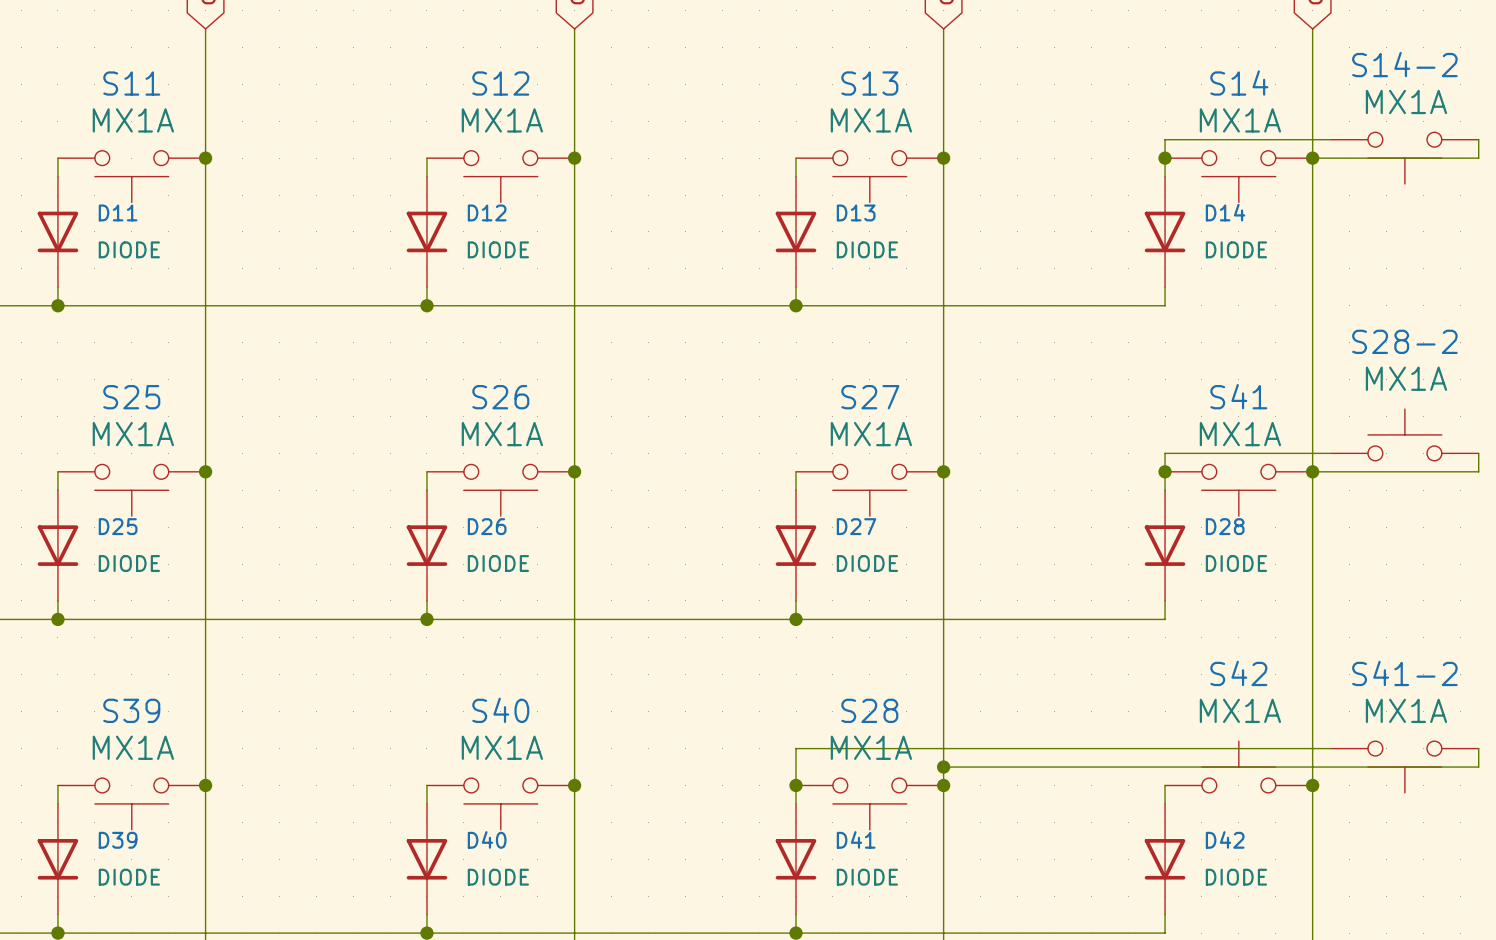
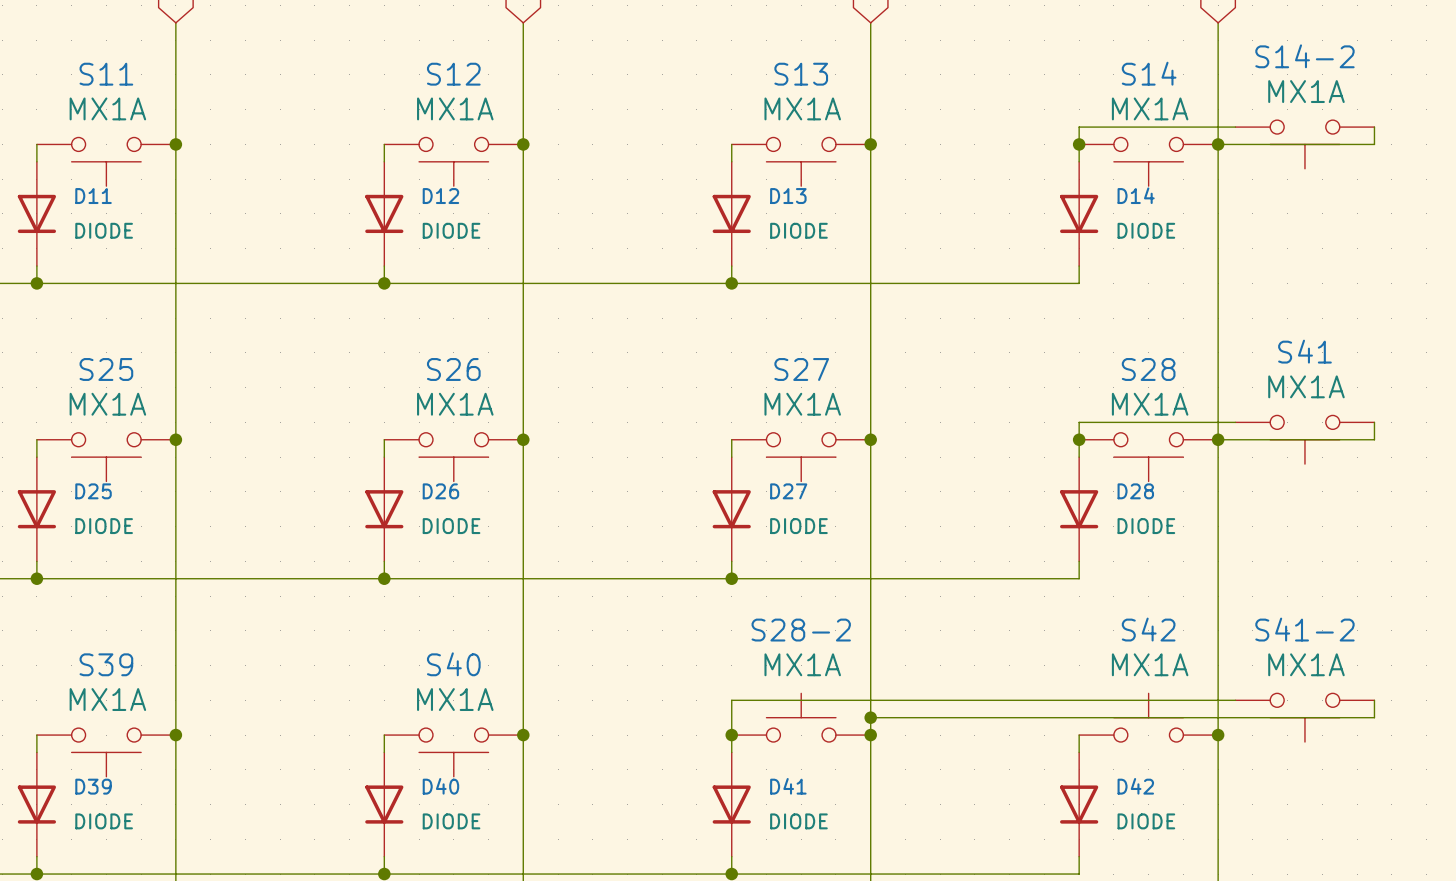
S41 name: S41 (1238, 396) -> S28 (1148, 369)
S28-2 position: (1404, 434) -> (801, 717)
S41: none -> MX1A (1304, 439)
S28: MX1A (869, 803) -> none

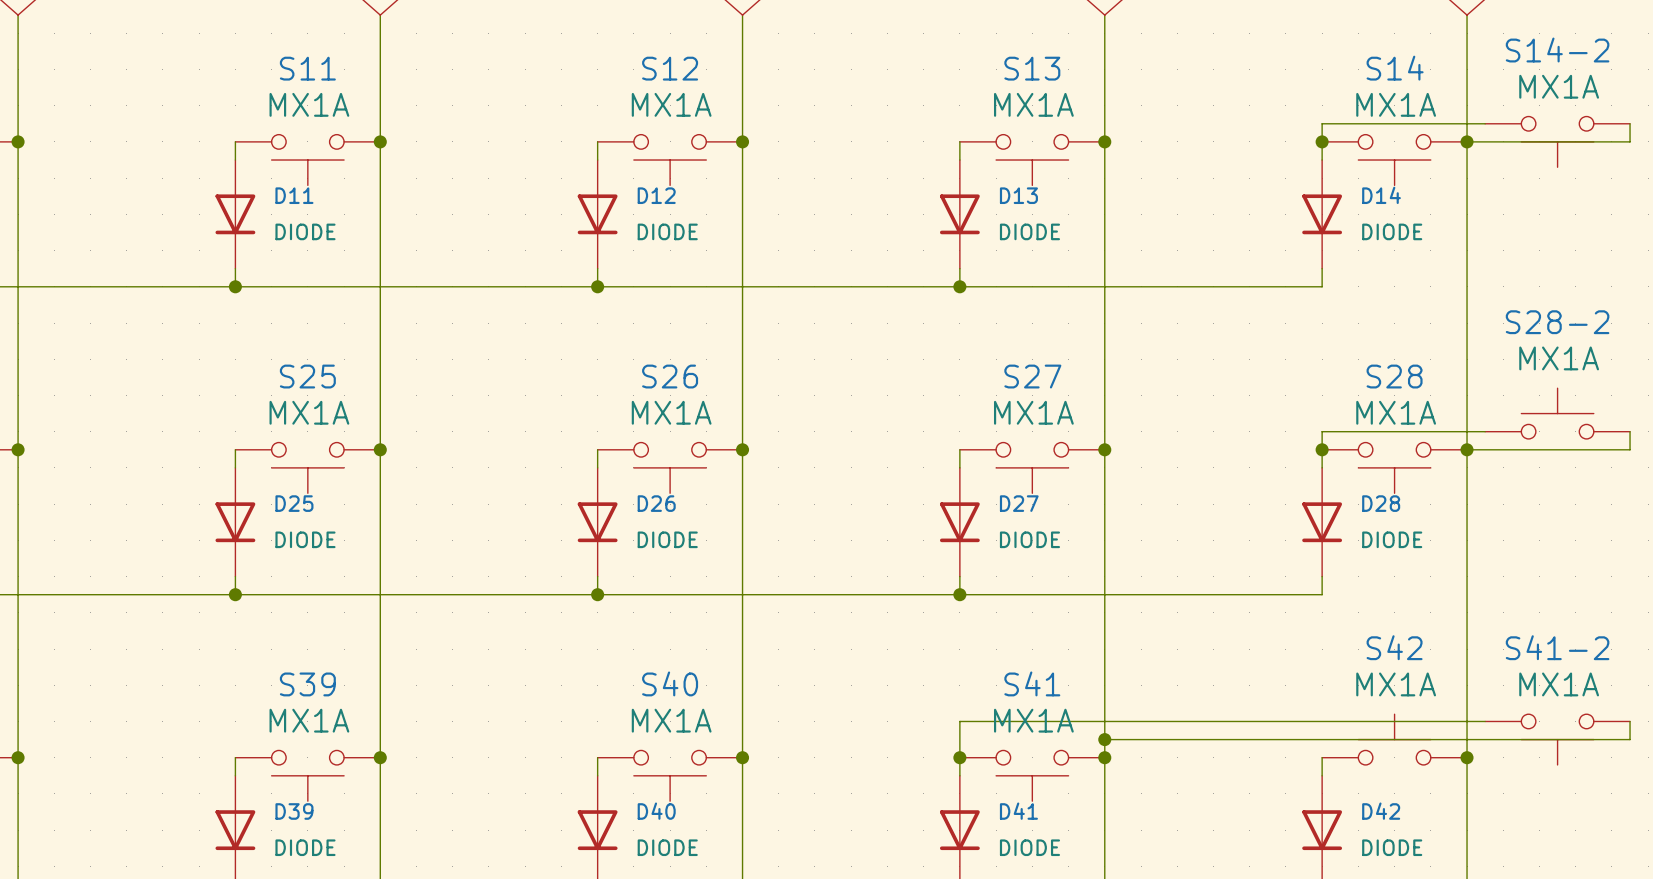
S41 position: (1304, 439) -> (1032, 775)
S28-2 position: (801, 717) -> (1557, 413)

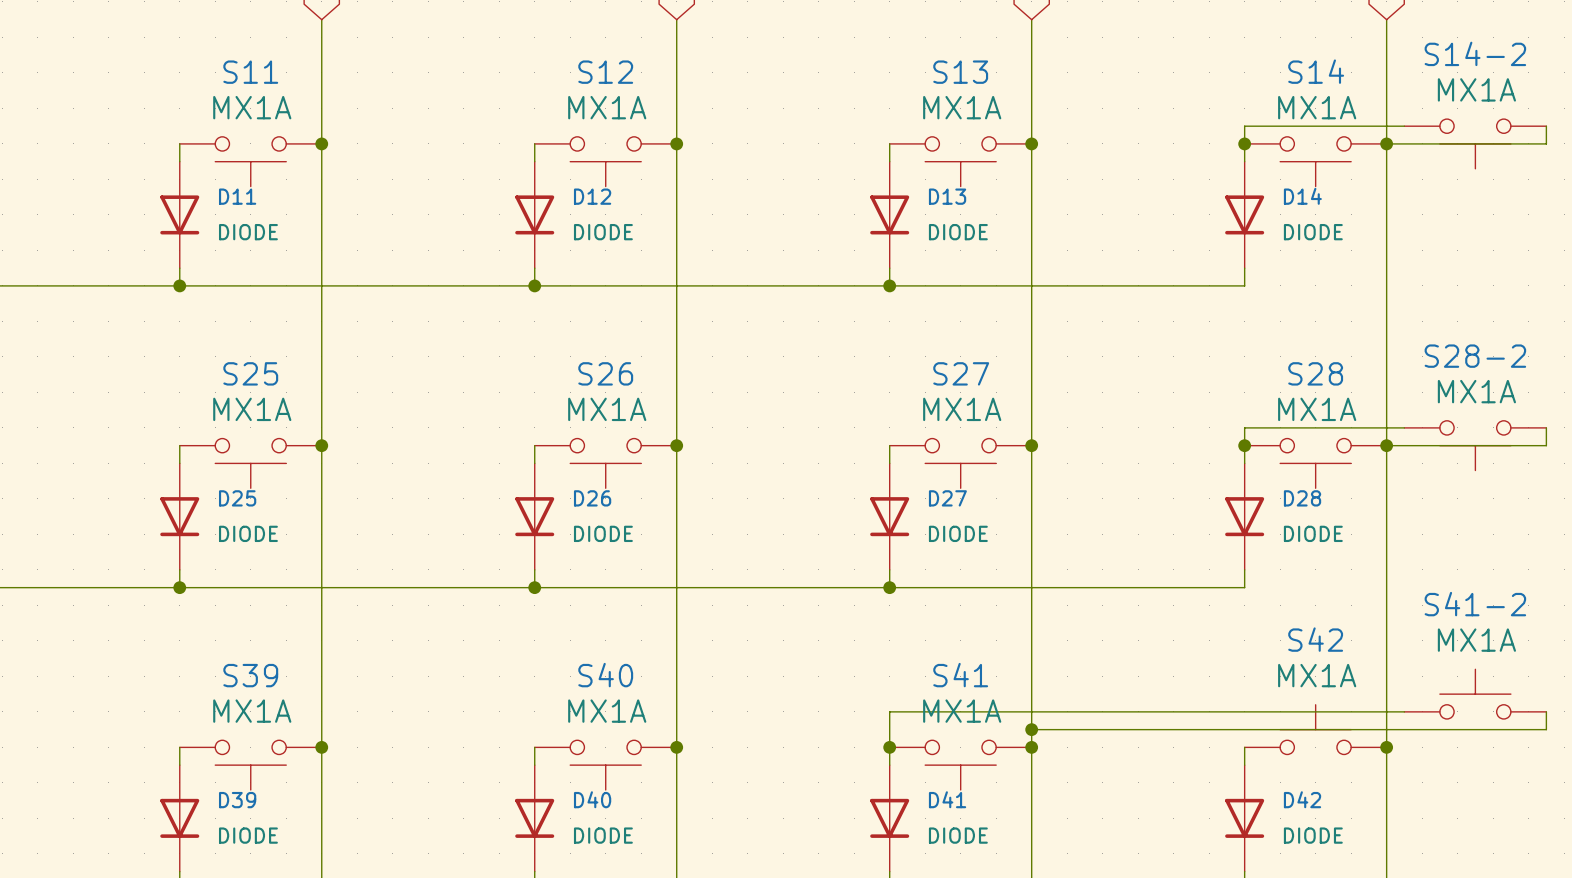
S28-2 rotation: 0° (1557, 413) -> 180° (1475, 445)
S41-2 rotation: 0° (1557, 739) -> 180° (1475, 694)

